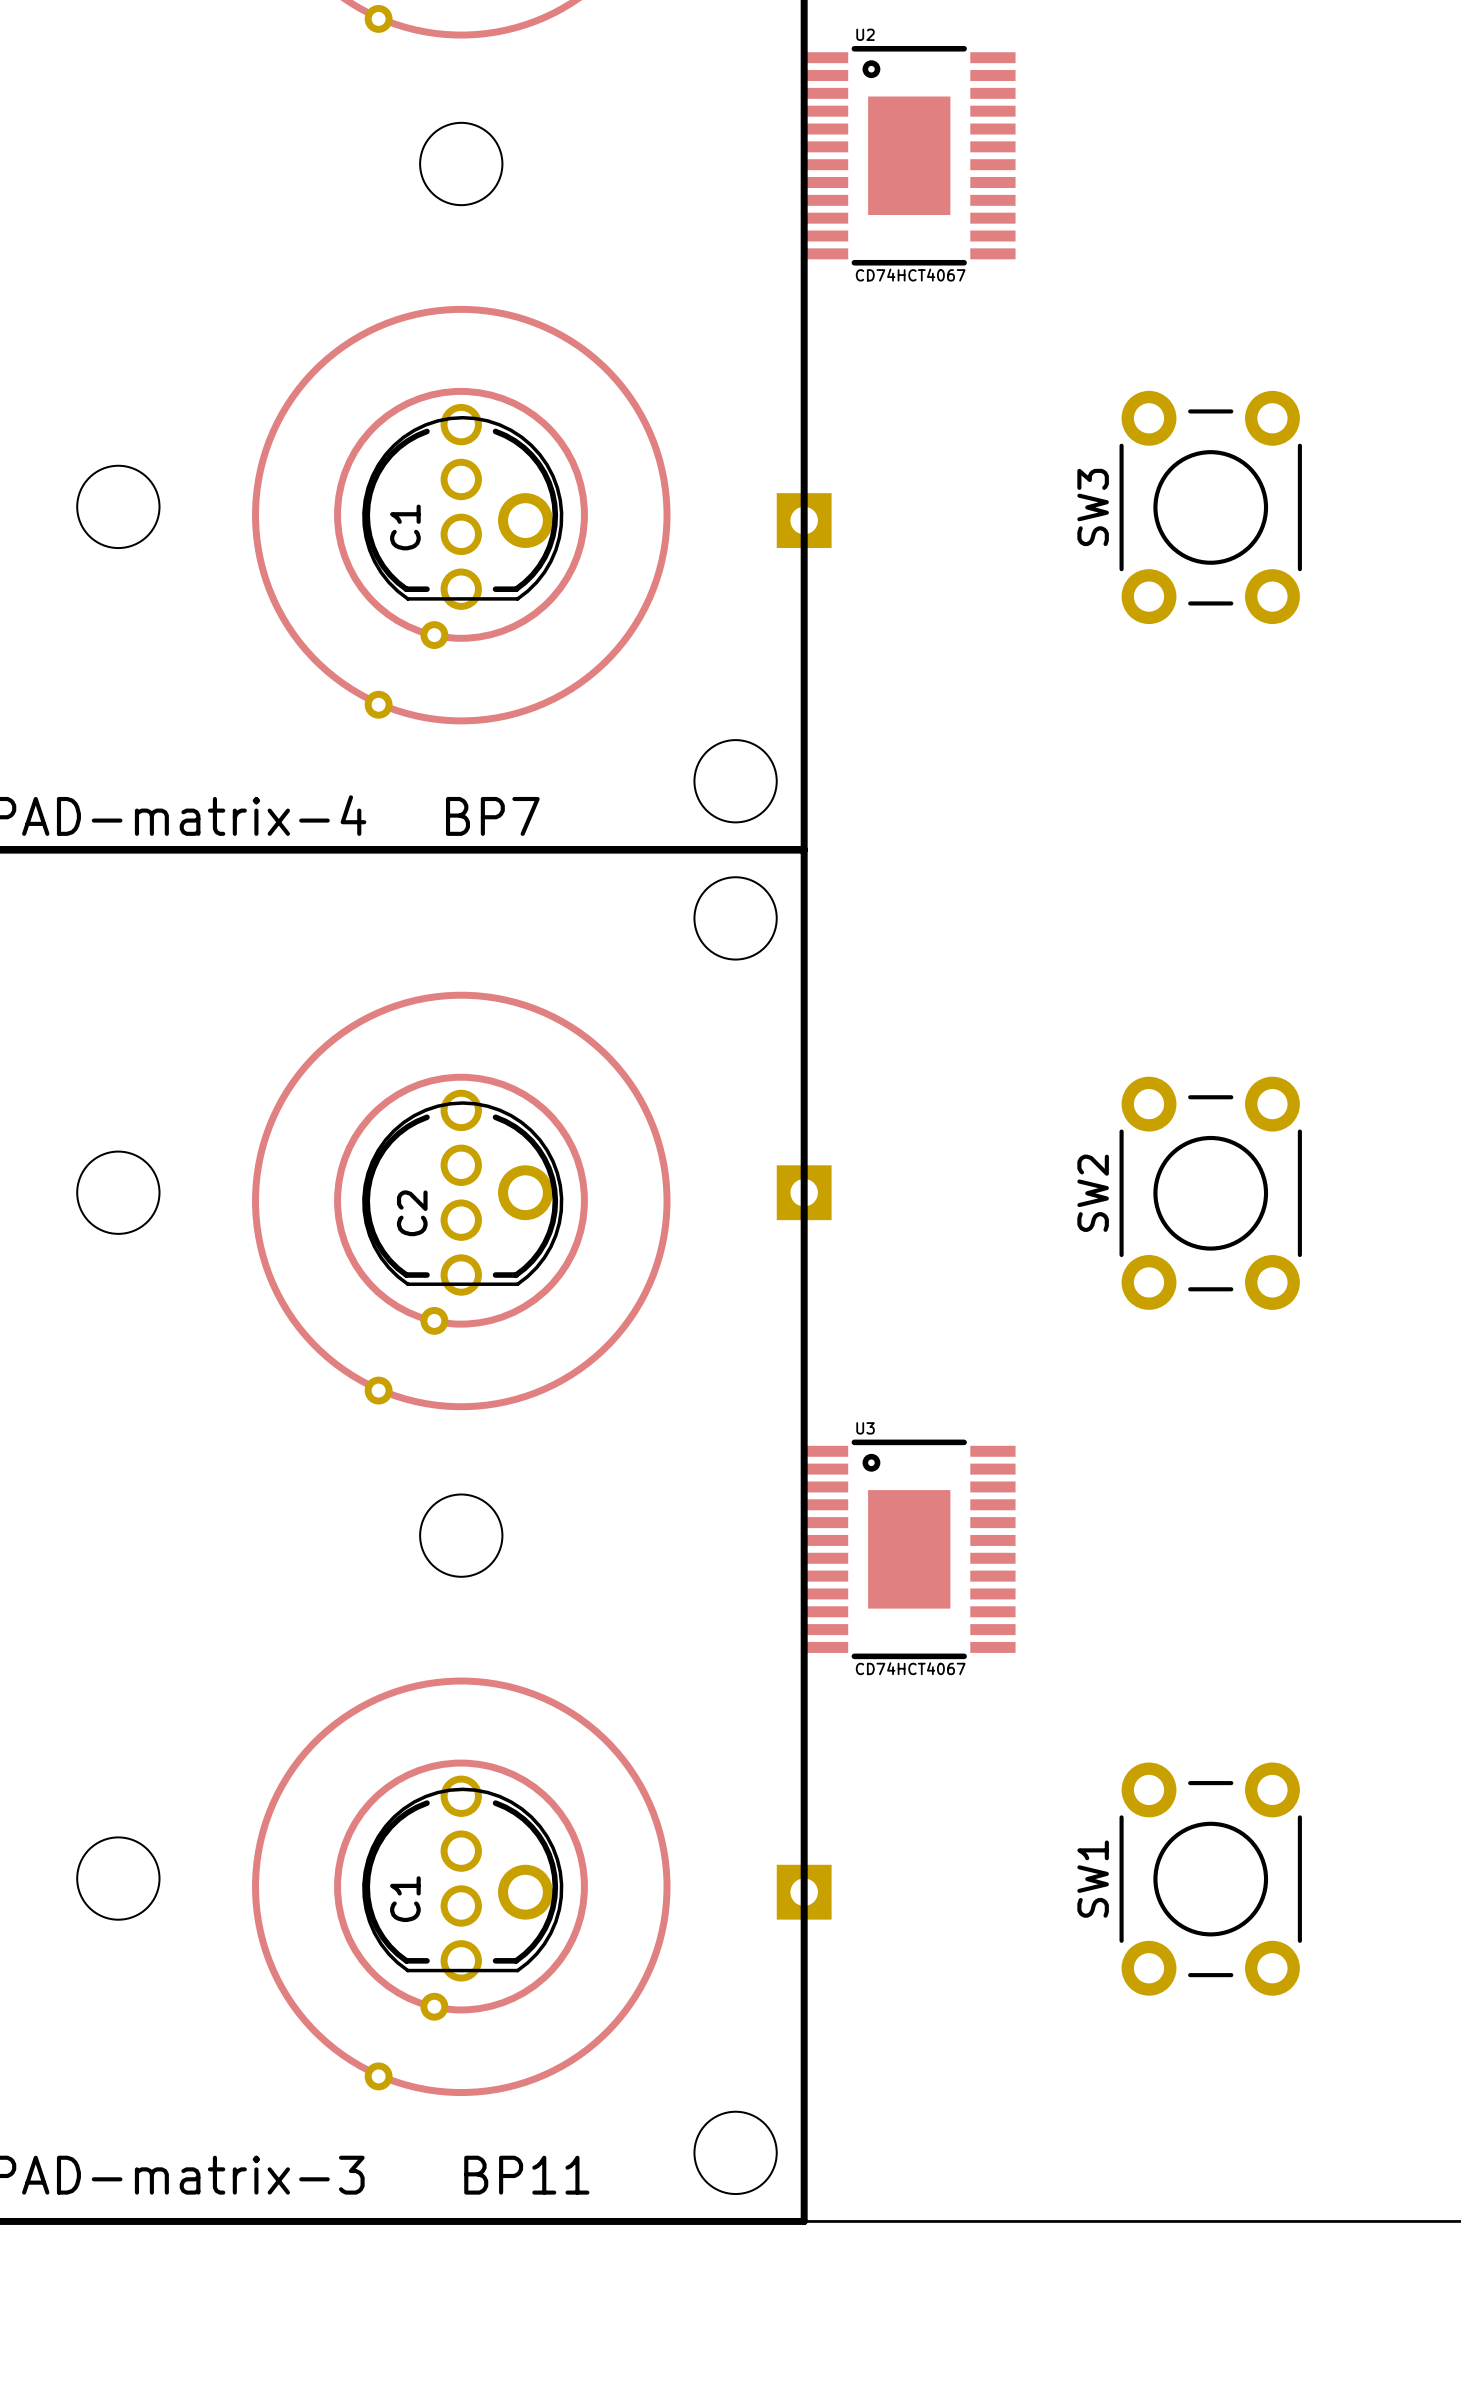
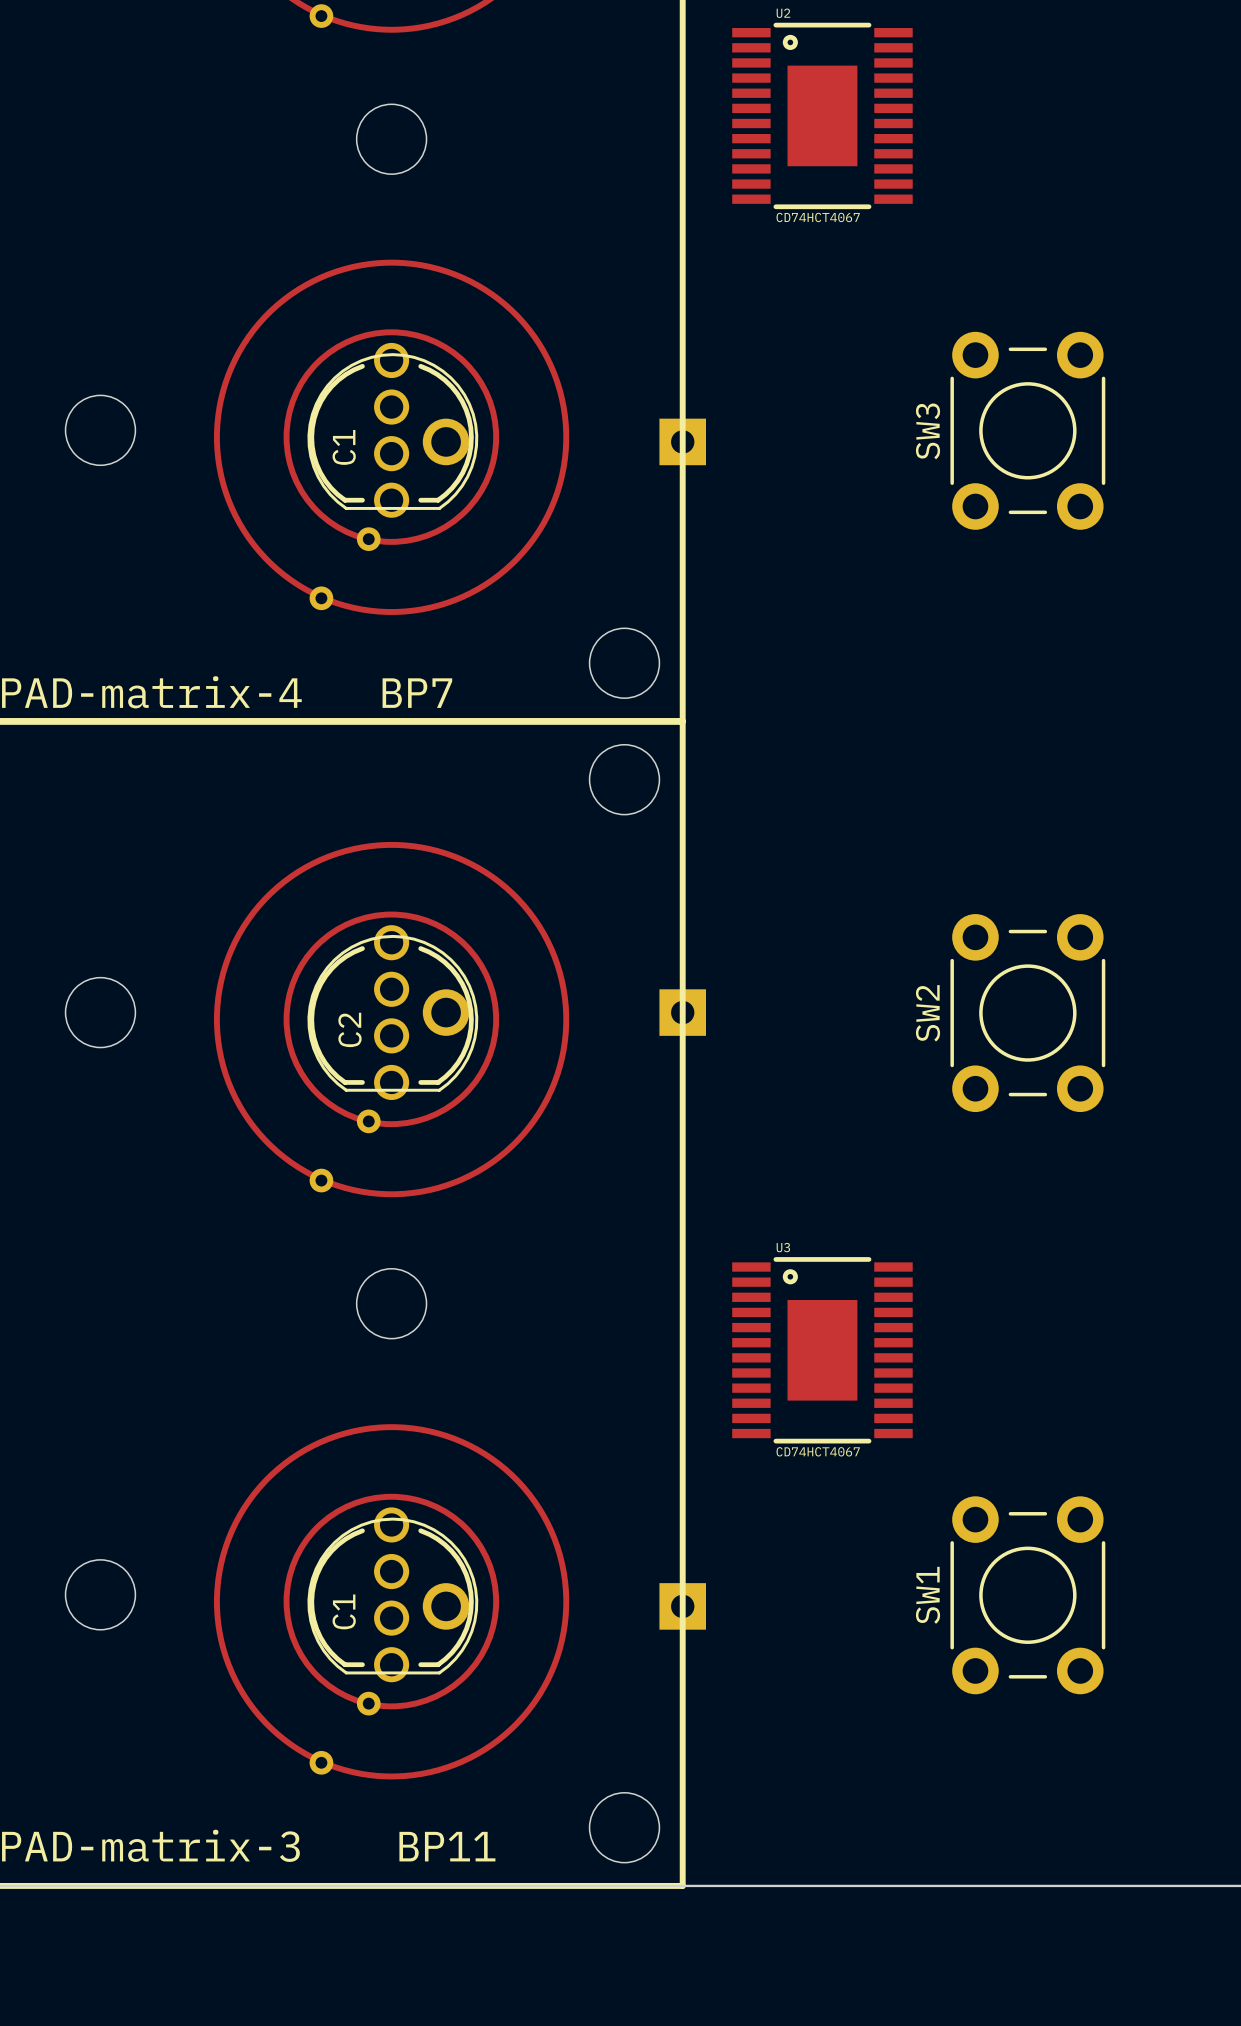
U2 position: (909, 155) -> (822, 115)
U3 position: (909, 1549) -> (822, 1350)

